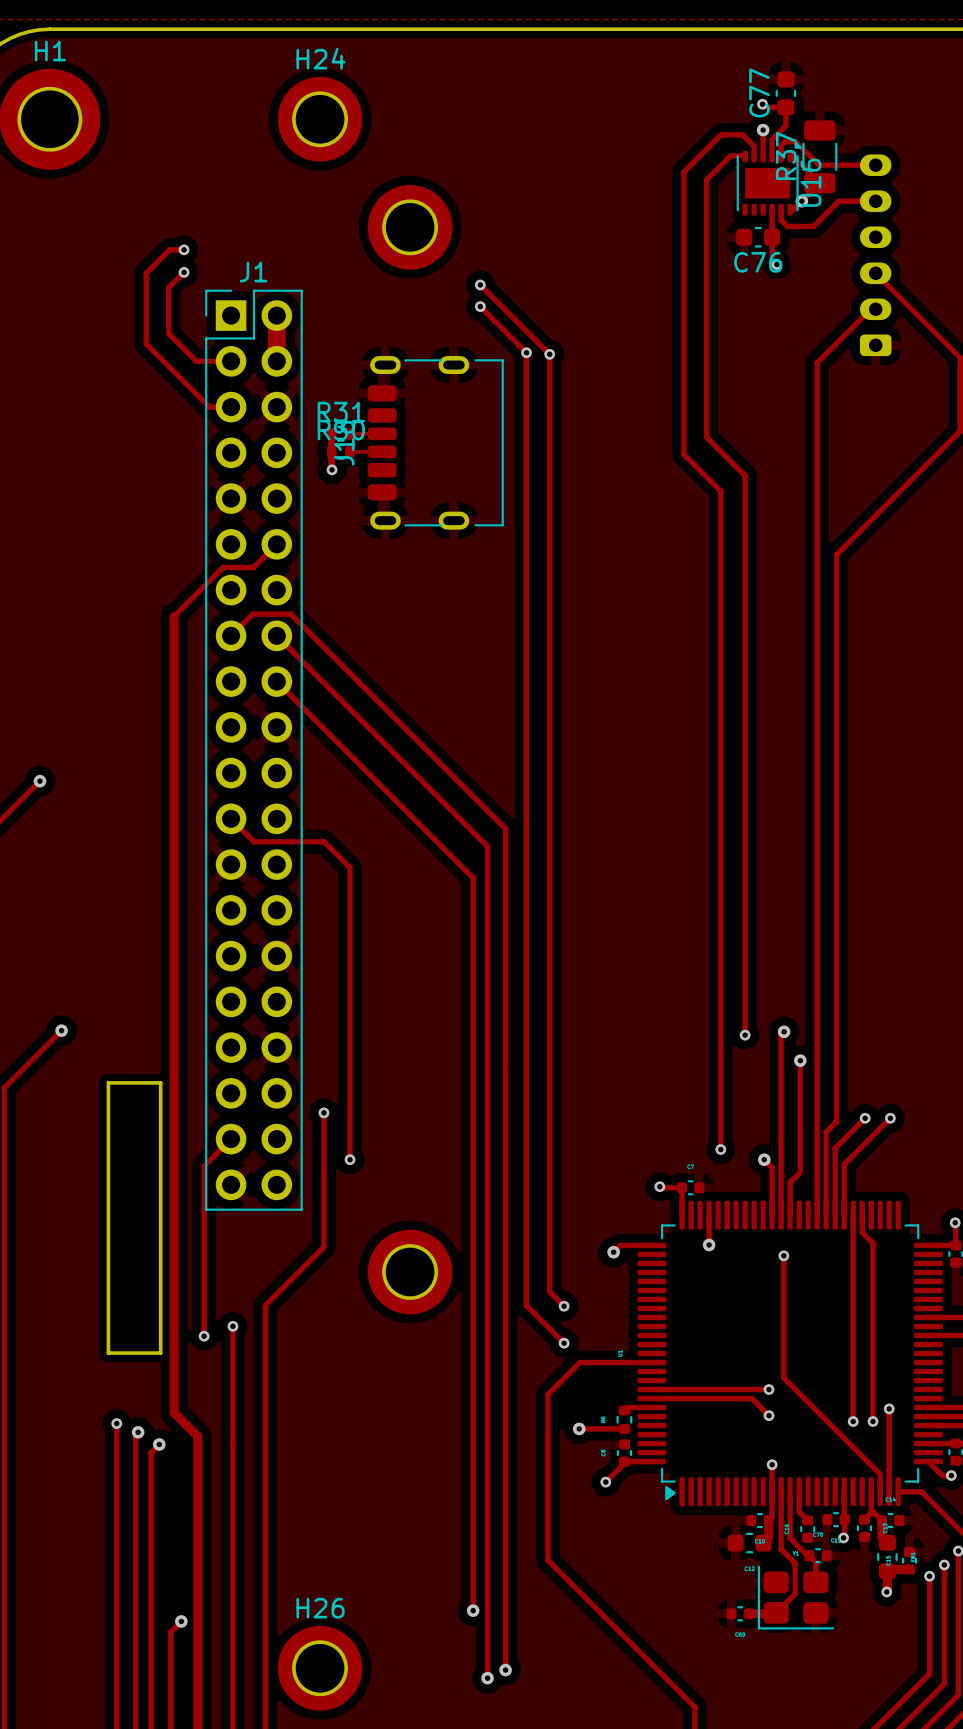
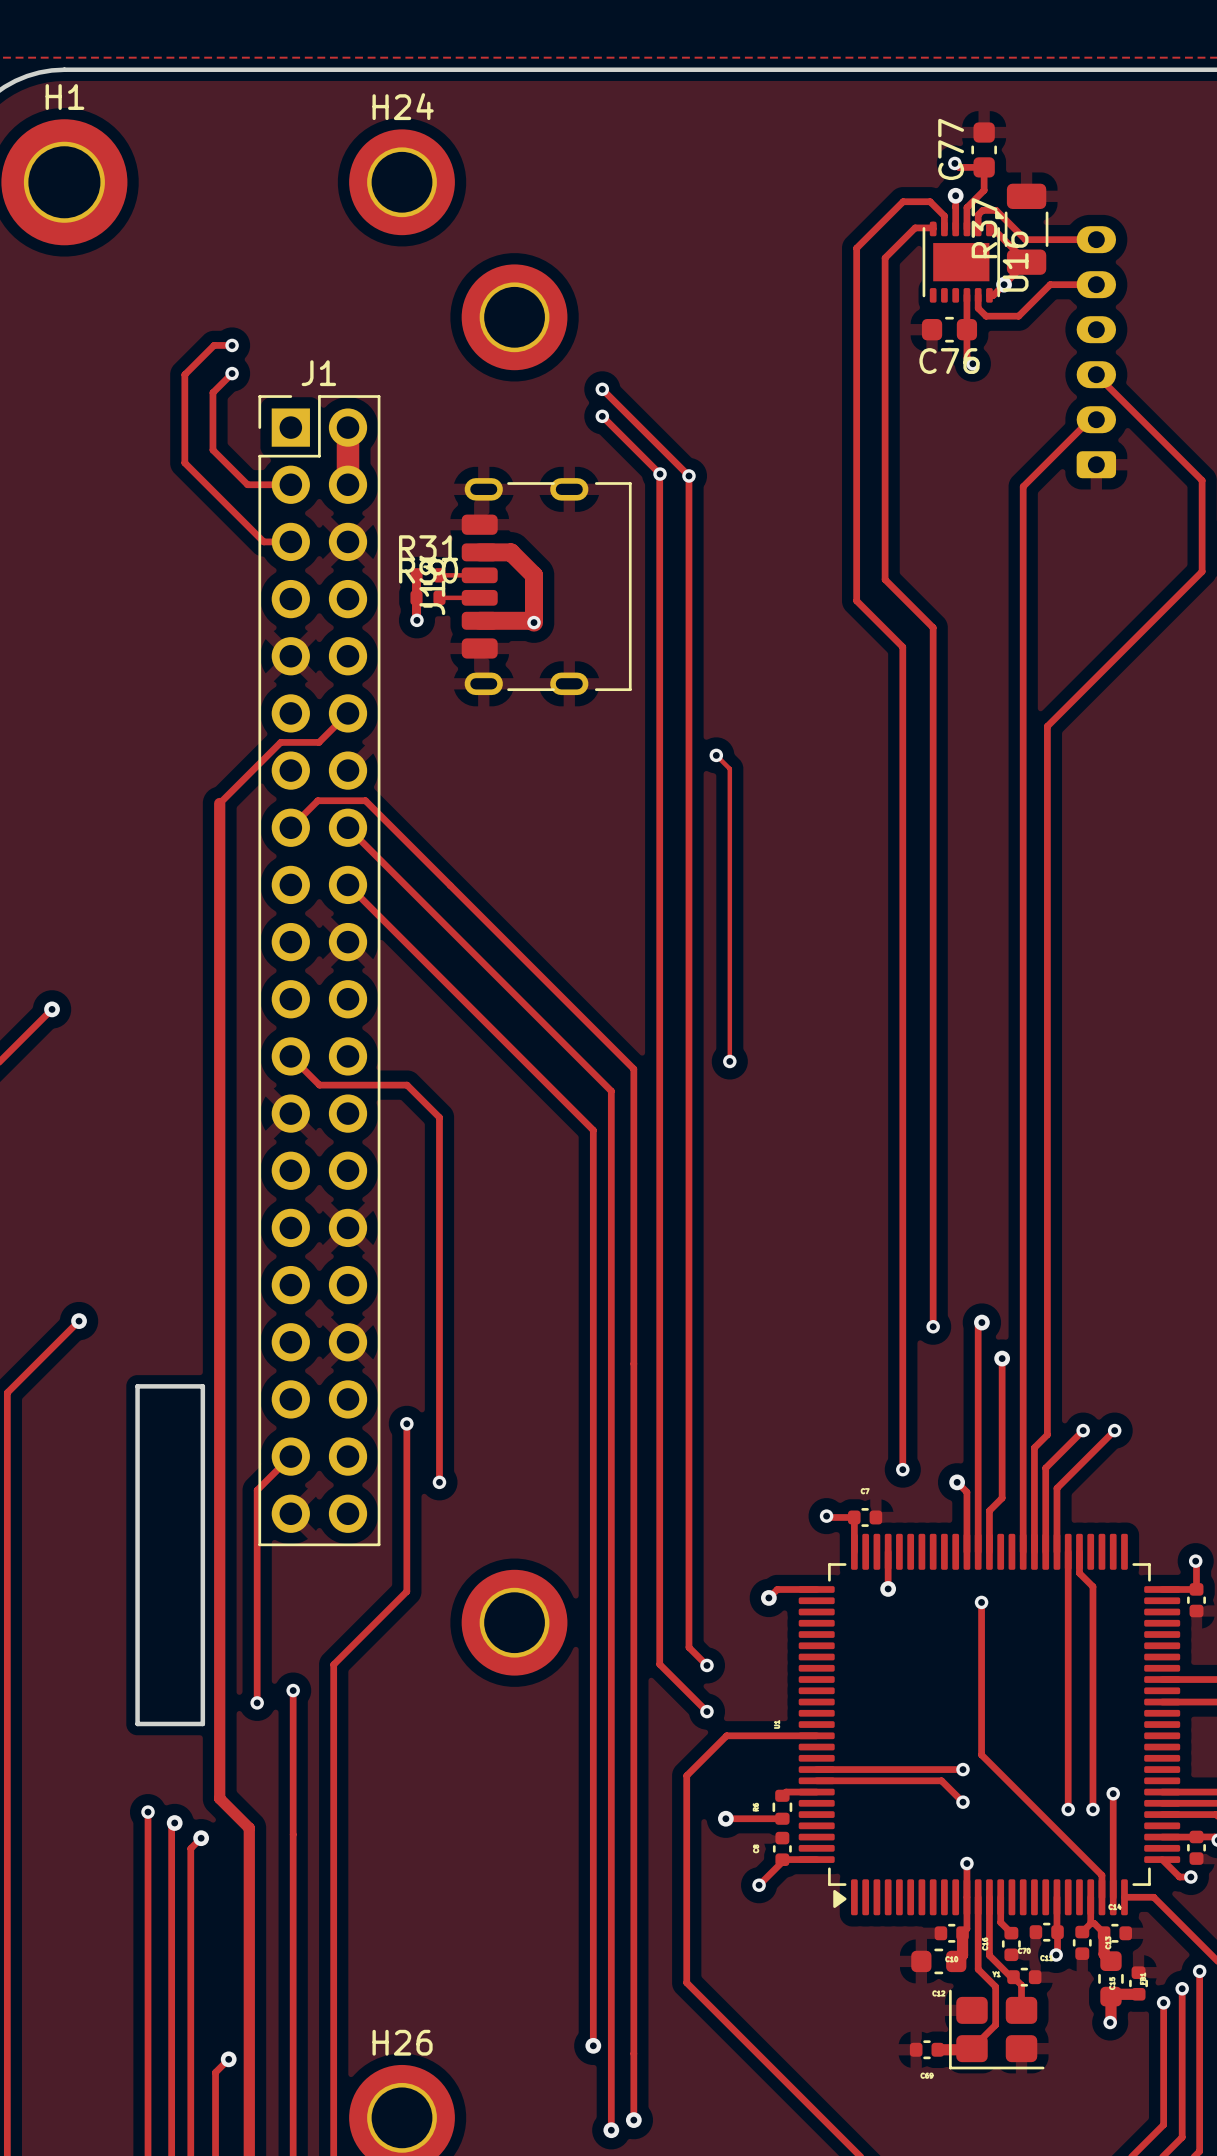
track: none -> (479, 552) (511, 552) (534, 575) (534, 622) (532, 620) (479, 620)
via: none -> (534, 622)
track: none -> (716, 755) (729, 768) (729, 1061)
via: none -> (716, 755)
via: none -> (729, 1061)

